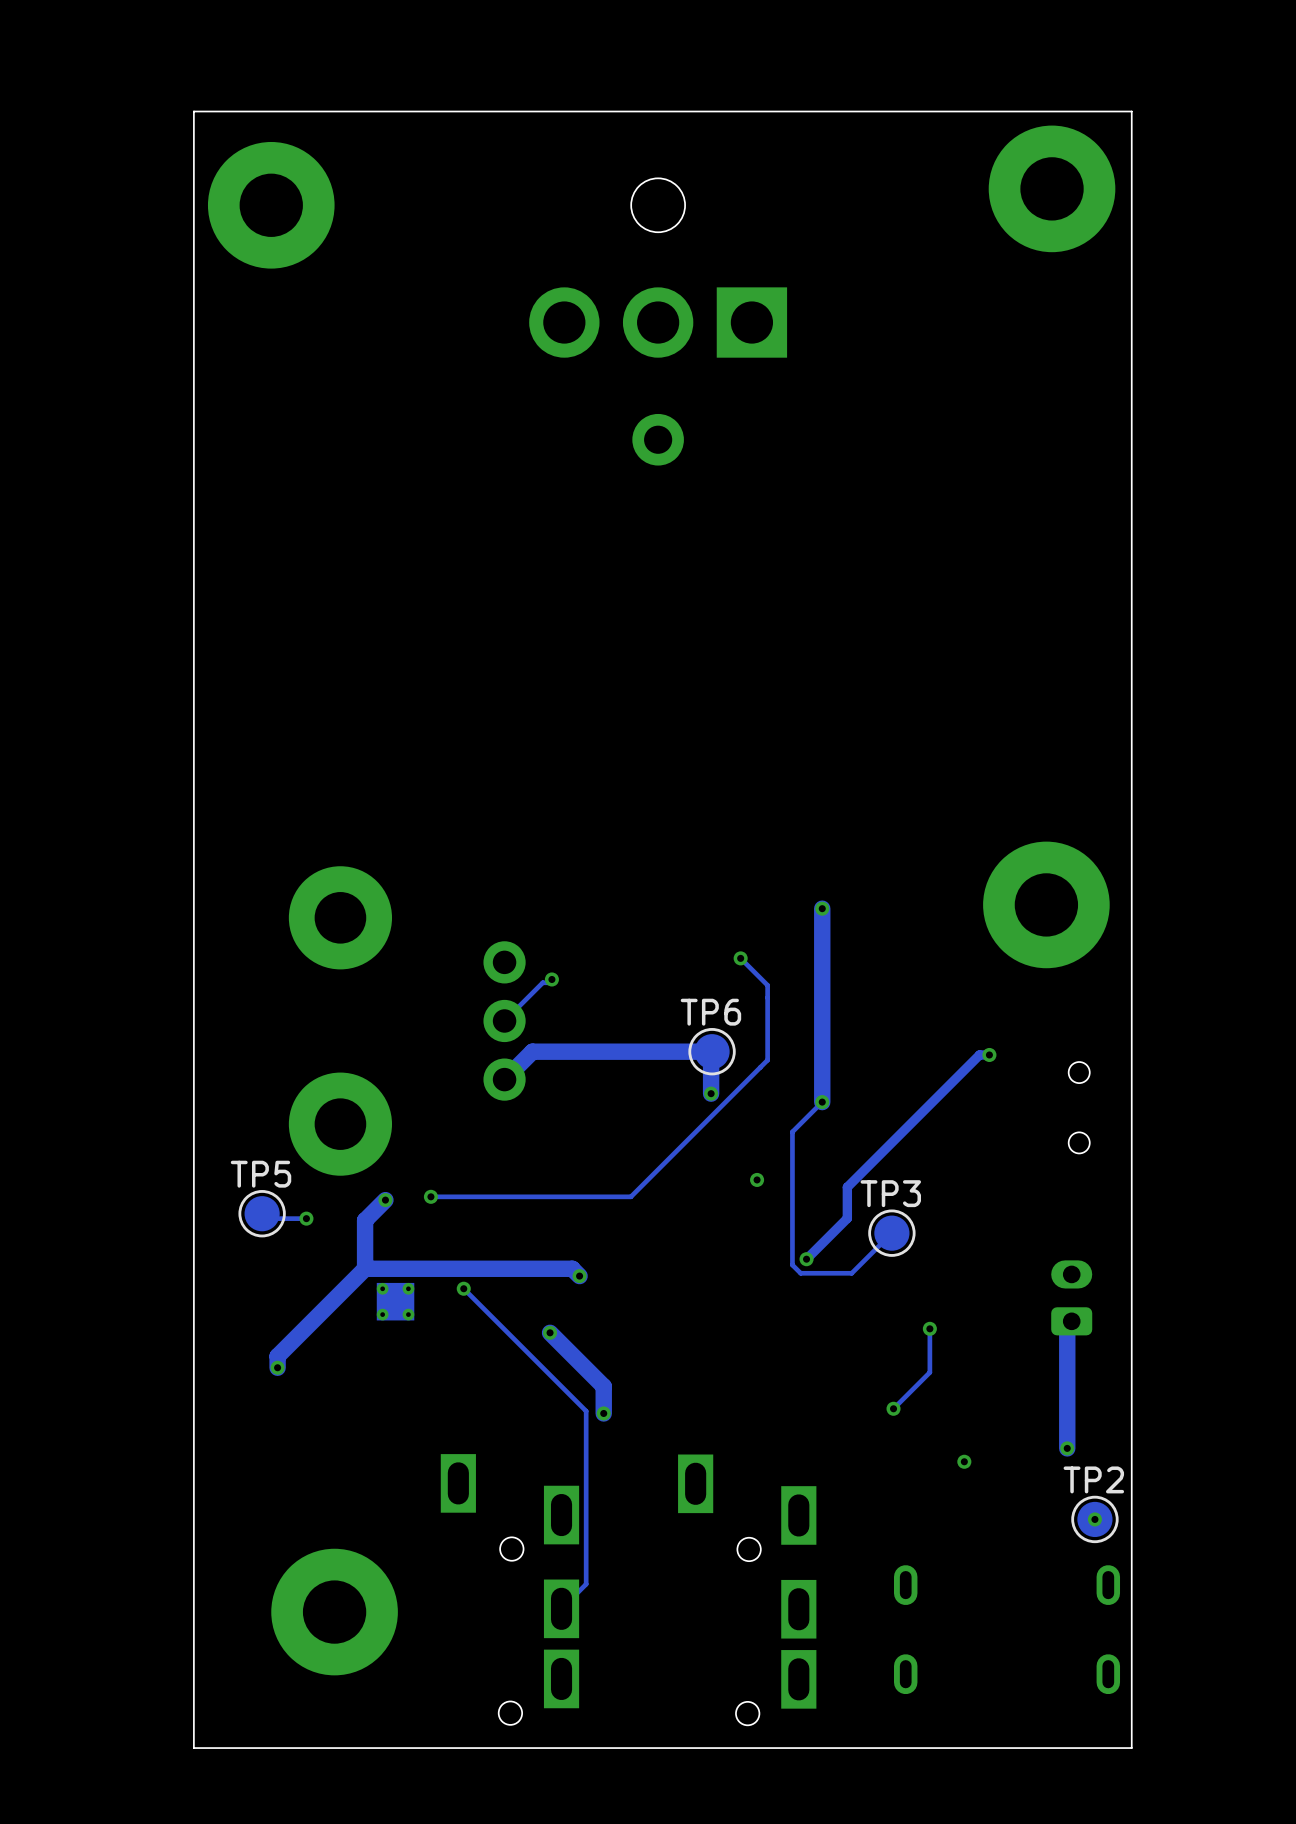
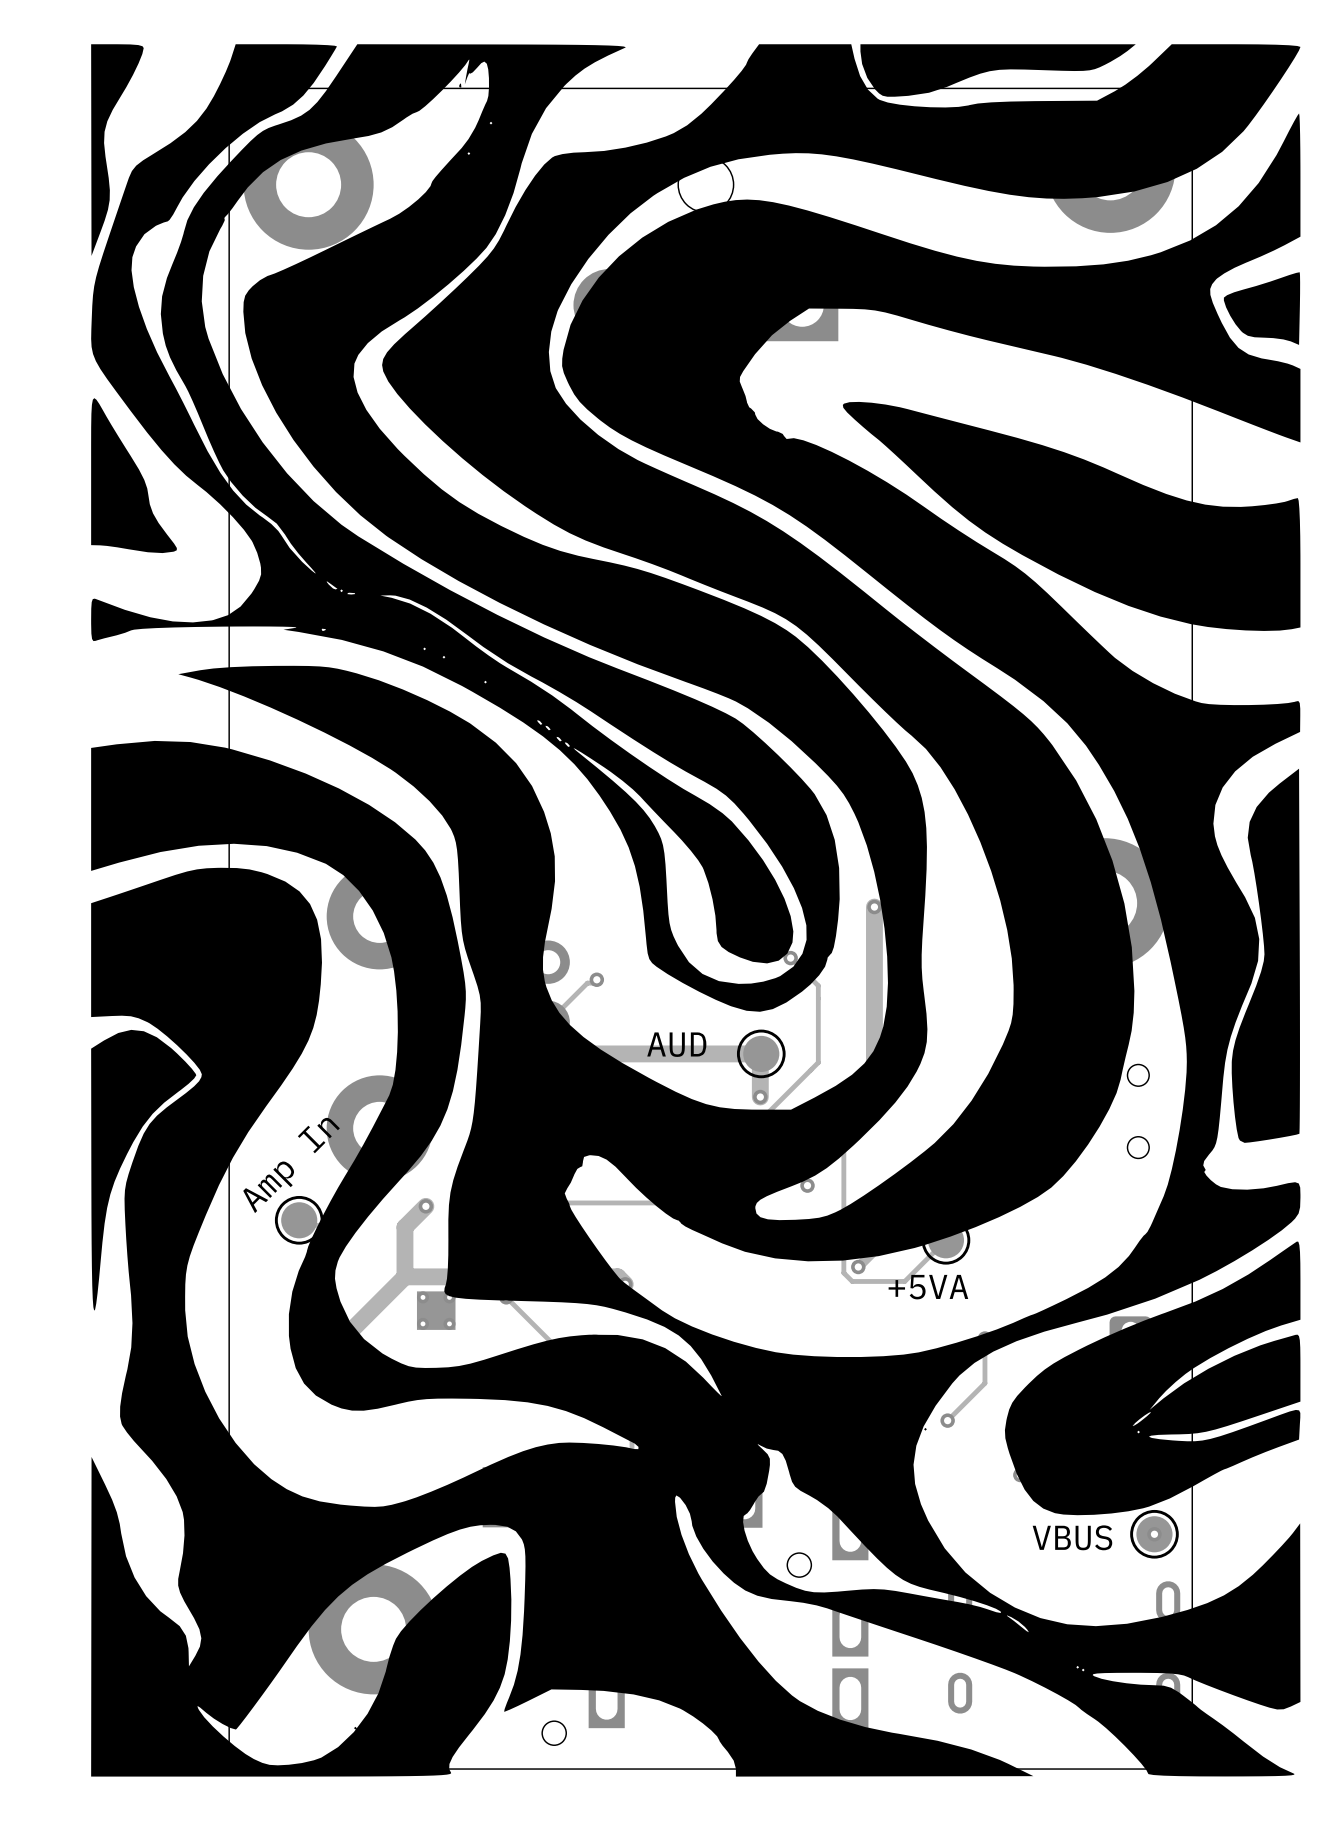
drawing: none -> [91, 44, 1301, 1777]
TP6 name: TP6 (710, 1012) -> none
text: none -> AUD (676, 1044)
text: none -> Amp In (291, 1165)
TP5 name: TP5 (261, 1174) -> none
TP3 name: TP3 (890, 1193) -> none
text: none -> +5VA (928, 1287)
TP2 name: TP2 (1093, 1479) -> none
text: none -> VBUS (1072, 1537)

